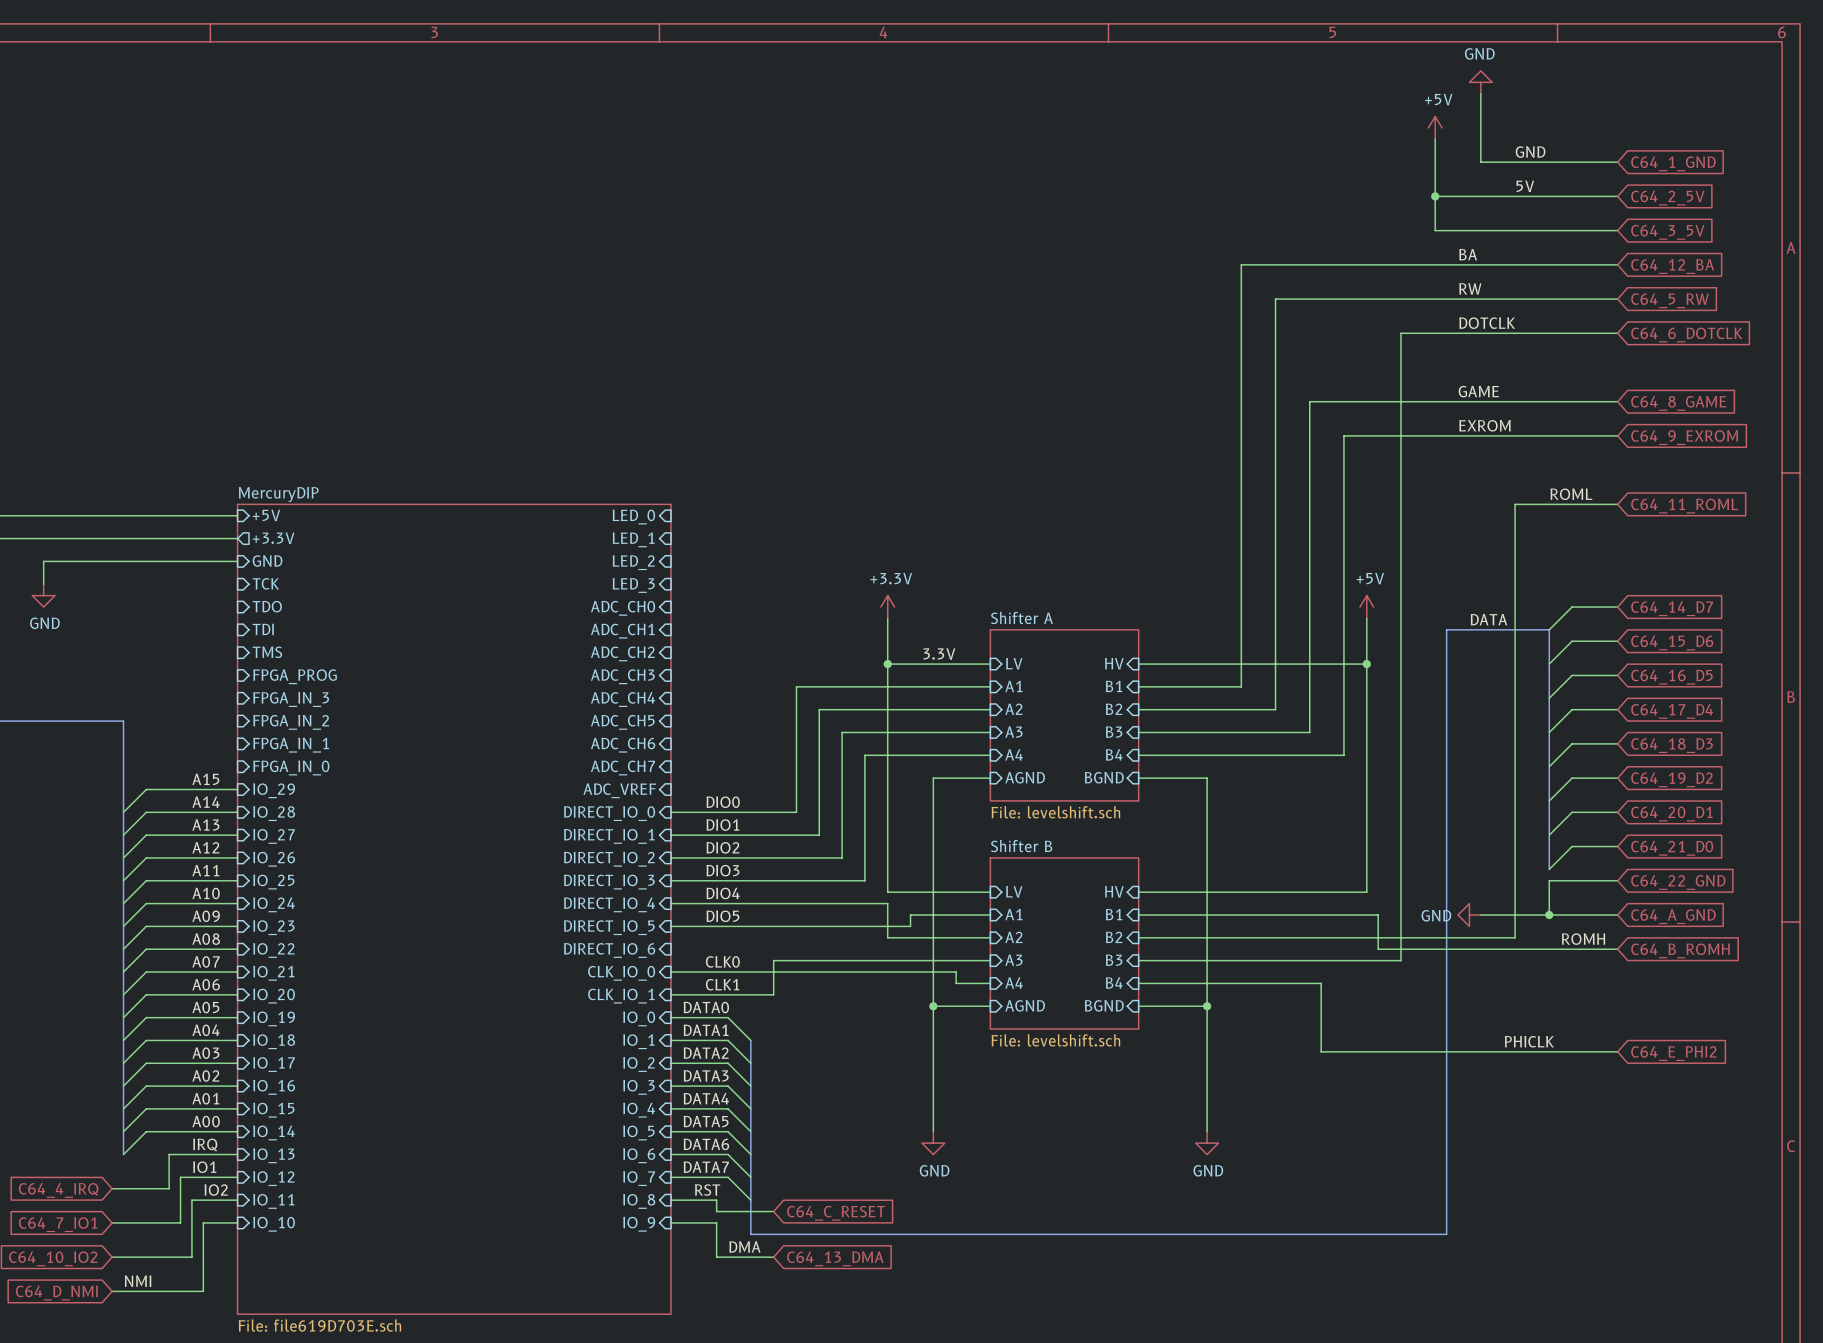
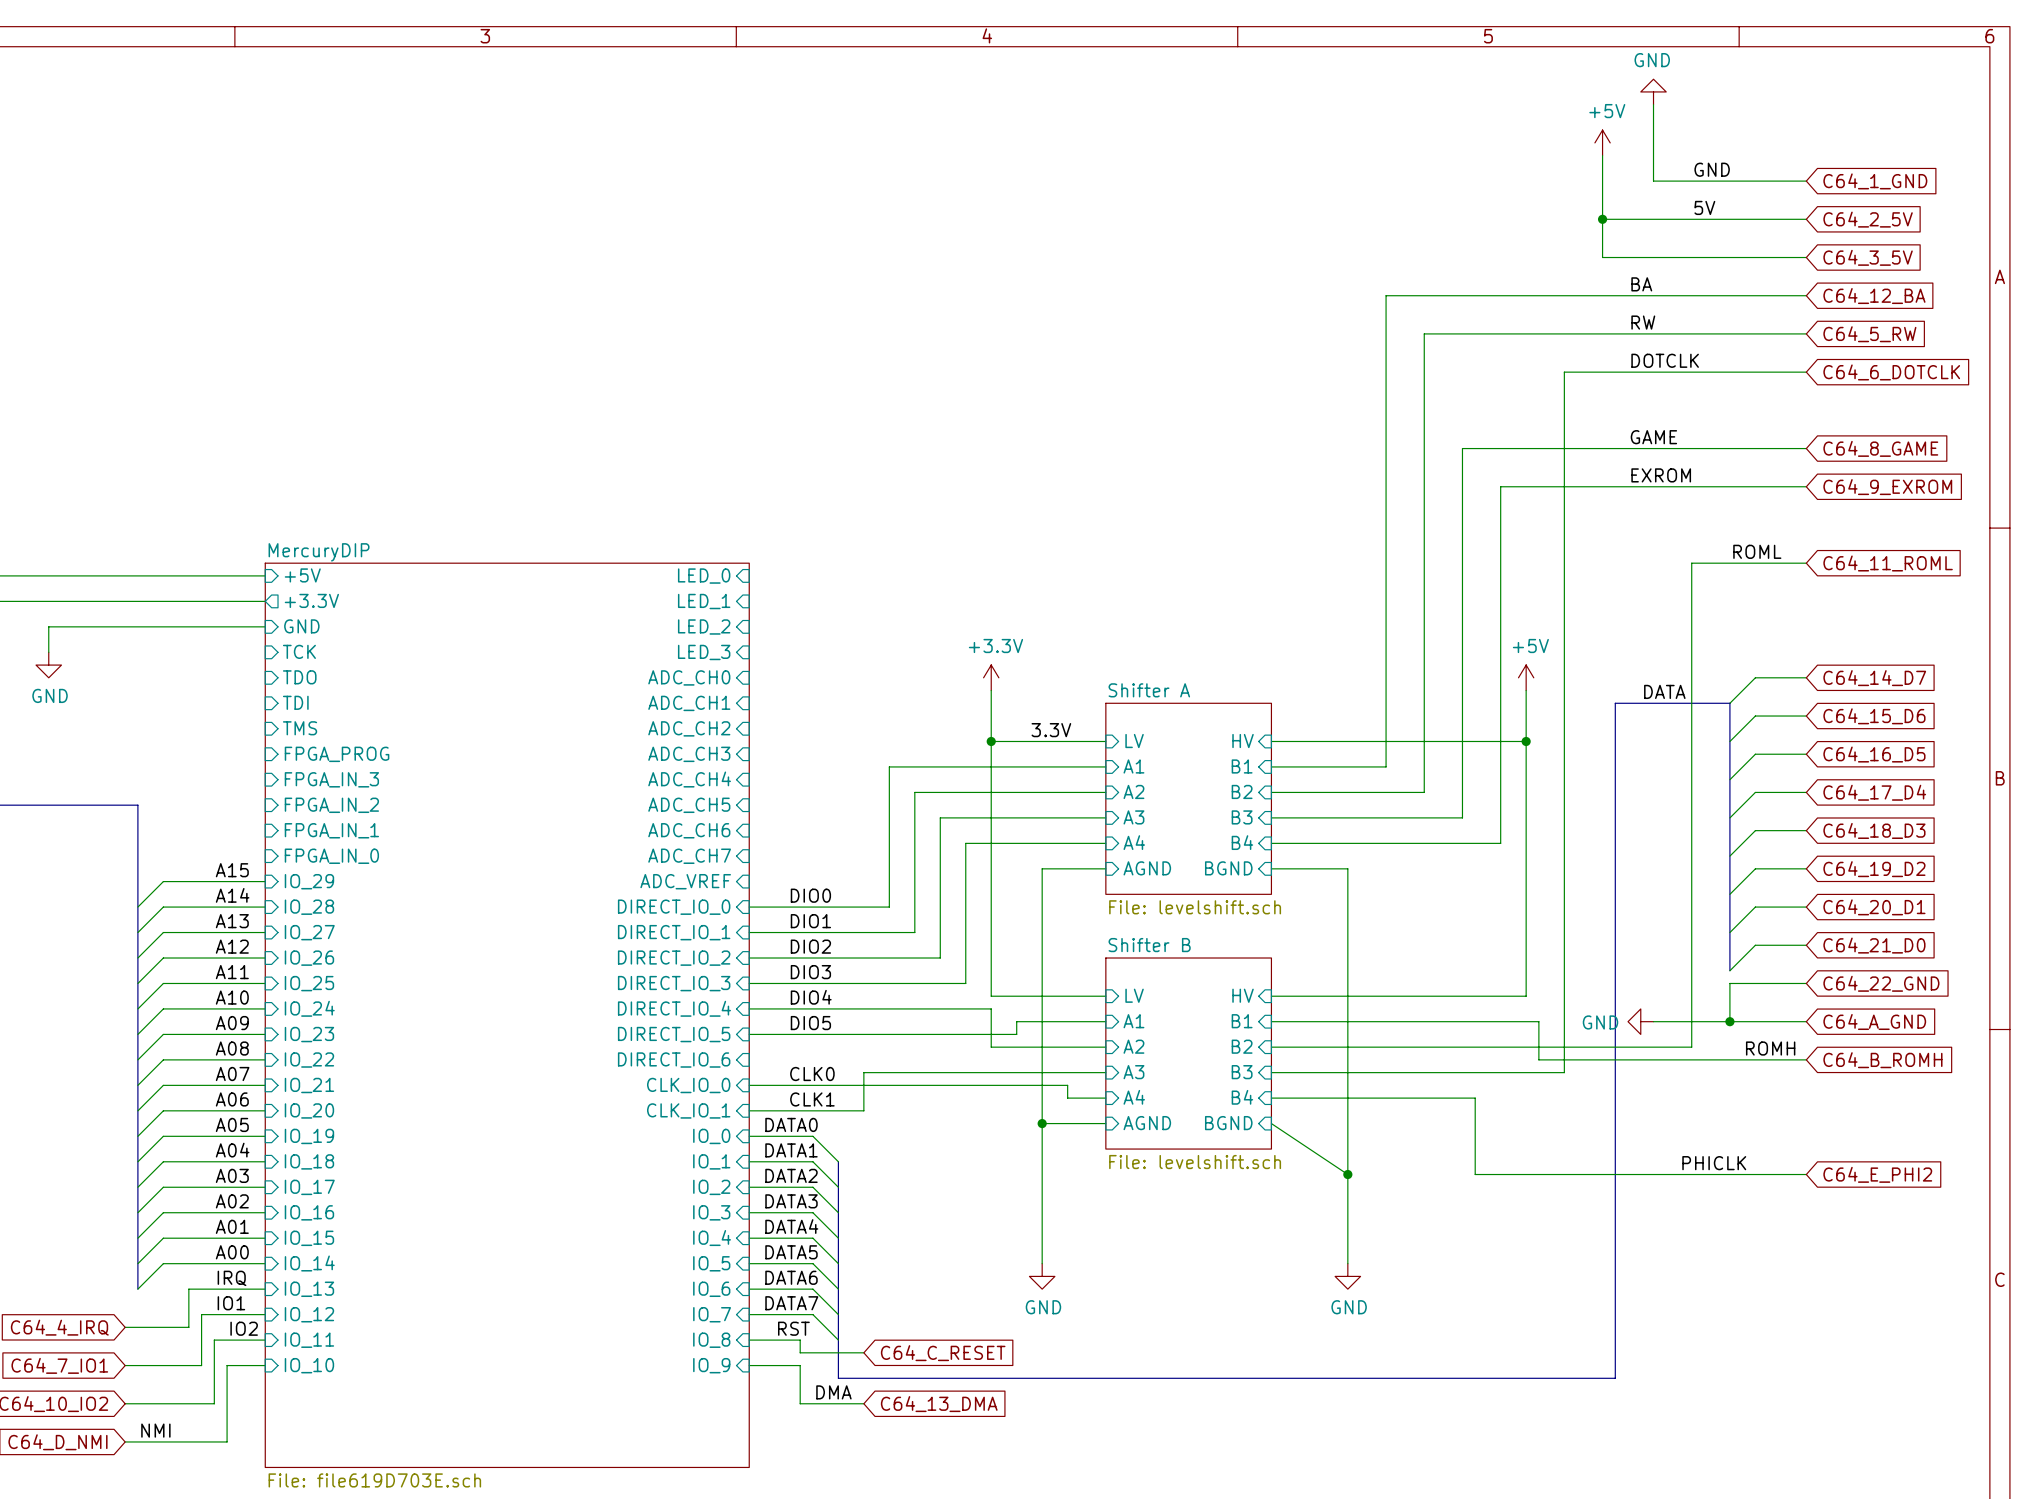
wire: (1138, 1006) (1207, 1006) -> (1271, 1123) (1347, 1174)
junction position: (1207, 1006) -> (1347, 1174)

